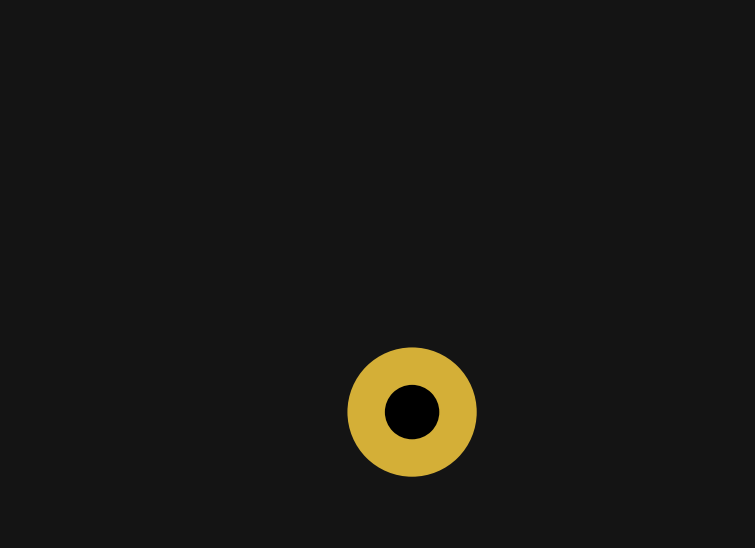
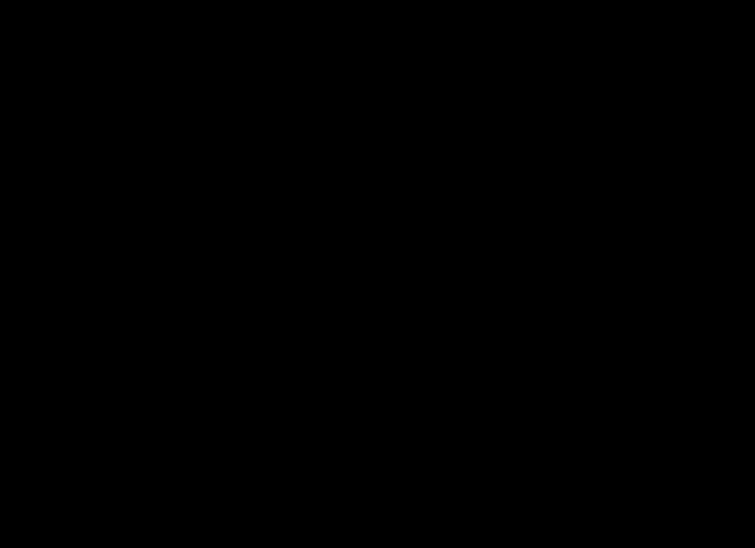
part: (412, 412) -> none

